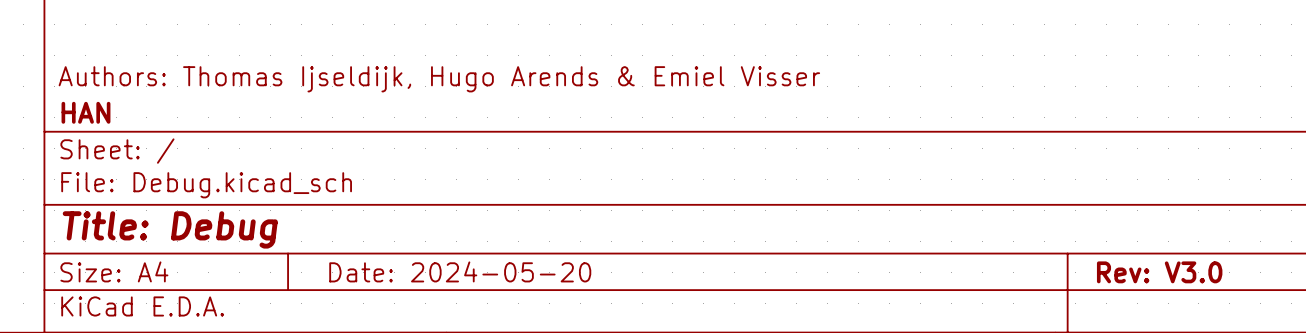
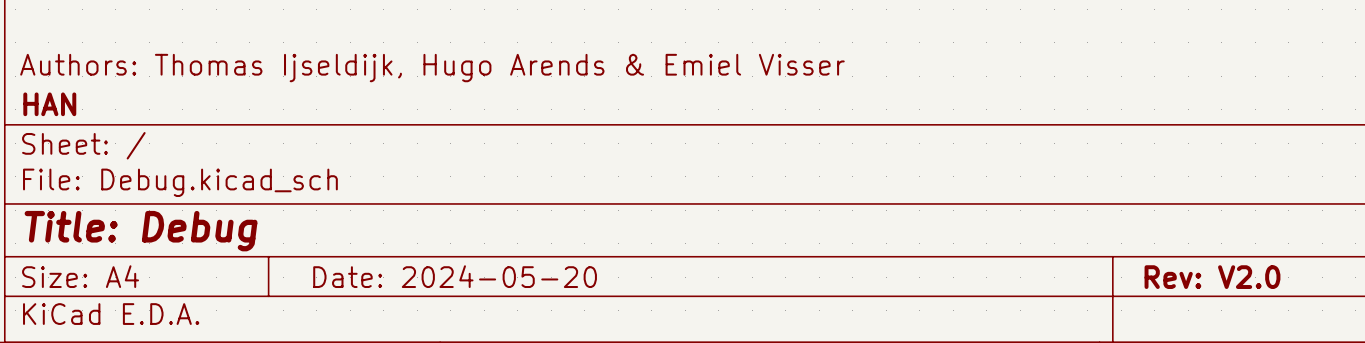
title block: Rev: V3.0 (1159, 272) -> Rev: V2.0 (1212, 277)

